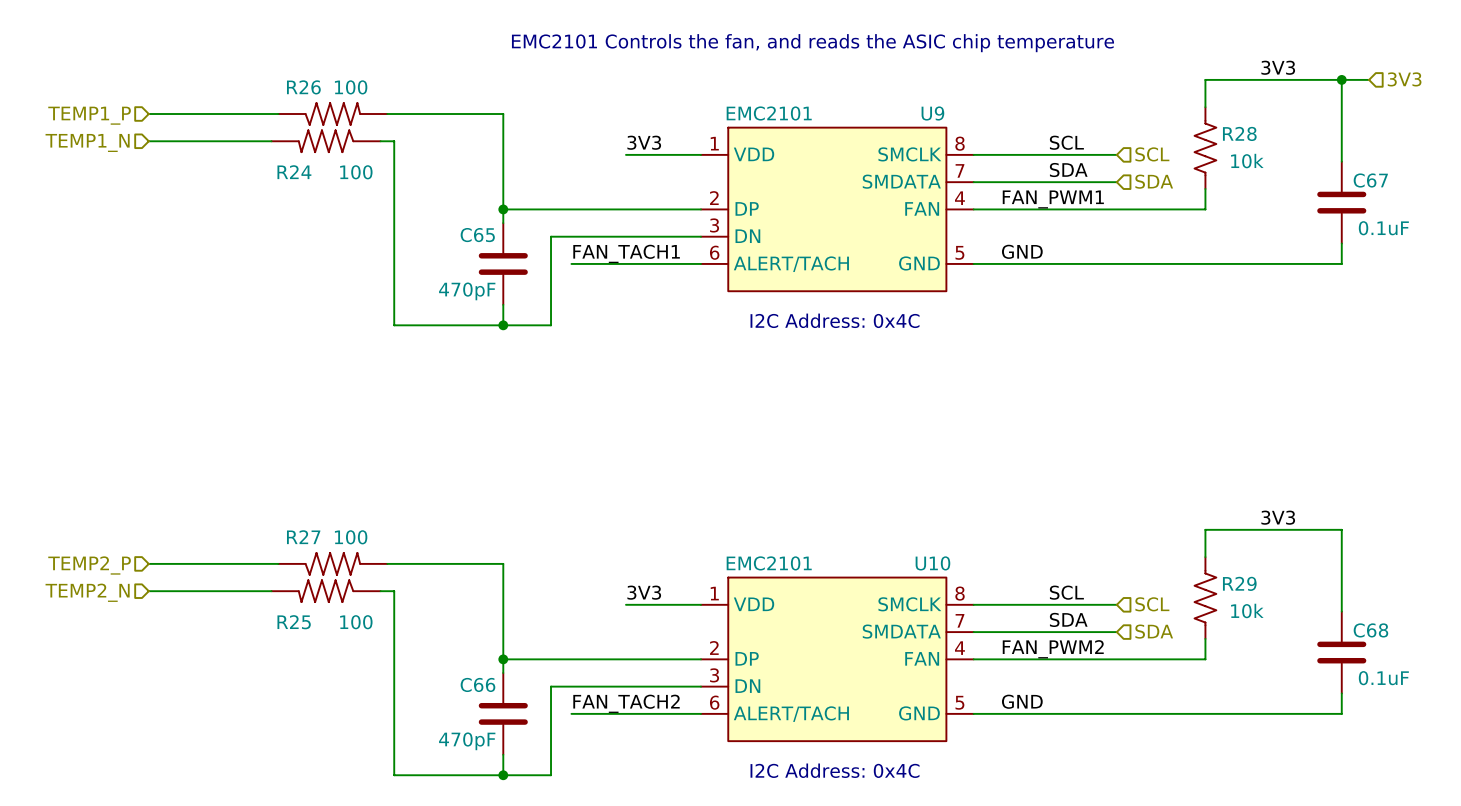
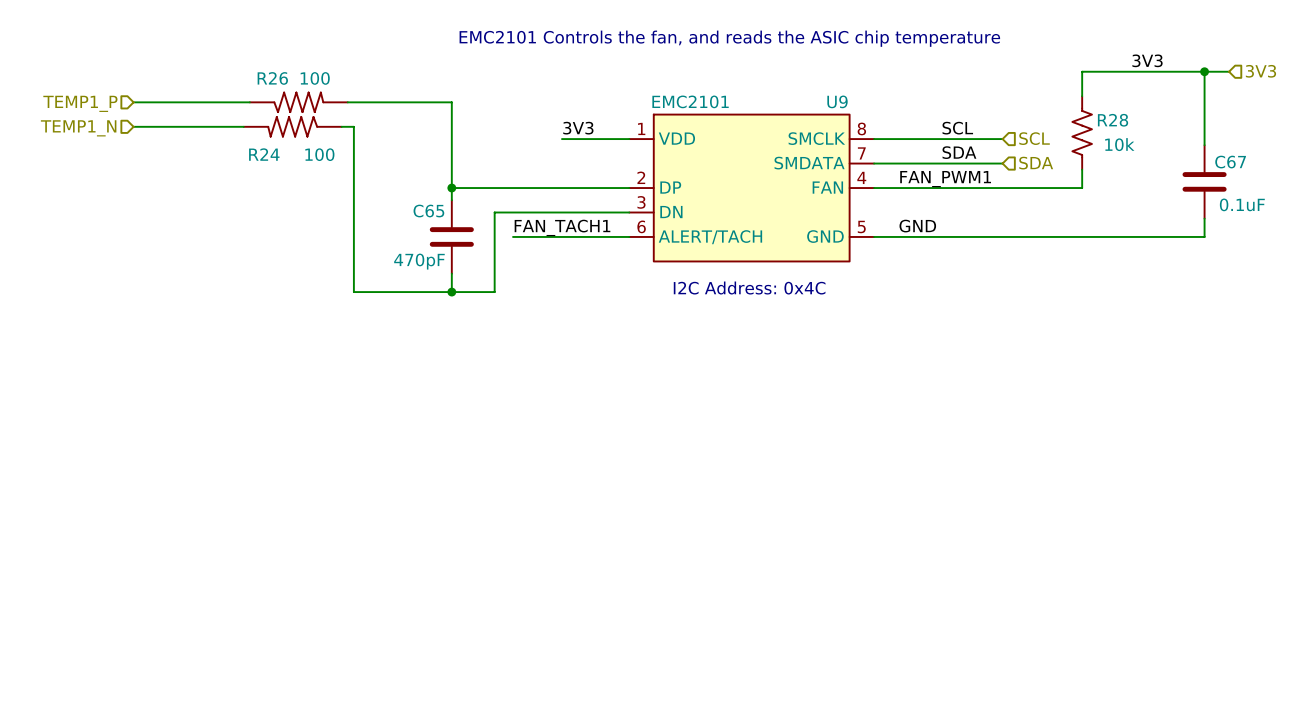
label: 3V3 (1278, 517) -> none
wire: (1205, 557) (1205, 529) (1341, 529) (1341, 611) -> none
wire: (148, 563) (278, 563) -> none
R27: 100 (332, 563) -> none
wire: (387, 563) (503, 563) (503, 659) -> none
hierarchical label: TEMP2_P (89, 565) -> none
wire: (148, 591) (271, 591) -> none
R25: 100 (326, 591) -> none
wire: (380, 591) (394, 591) (394, 775) (551, 775) (551, 686) (700, 686) -> none
hierarchical label: TEMP2_N (87, 592) -> none
label: 3V3 (644, 592) -> none
label: SCL (1066, 592) -> none
R29: 10k (1205, 598) -> none
wire: (625, 604) (700, 604) -> none
wire: (973, 604) (1116, 604) -> none
hierarchical label: SCL (1152, 604) -> none
label: SDA (1068, 619) -> none
hierarchical label: SDA (1154, 631) -> none
wire: (973, 632) (1116, 632) -> none
wire: (1205, 638) (1205, 659) (973, 659) -> none
label: FAN_PWM2 (1053, 649) -> none
C68: 0.1uF (1341, 652) -> none
wire: (503, 659) (503, 672) -> none
wire: (503, 659) (700, 659) -> none
junction: (503, 659) -> none
U10: EMC2101 (837, 659) -> none
wire: (1341, 693) (1341, 713) (973, 713) -> none
label: GND (1022, 701) -> none
label: FAN_TACH2 (626, 703) -> none
C66: 470pF (503, 713) -> none
wire: (571, 713) (700, 713) -> none
wire: (503, 754) (503, 775) -> none
text: I2C Address: 0x4C (835, 770) -> none
junction: (503, 775) -> none

